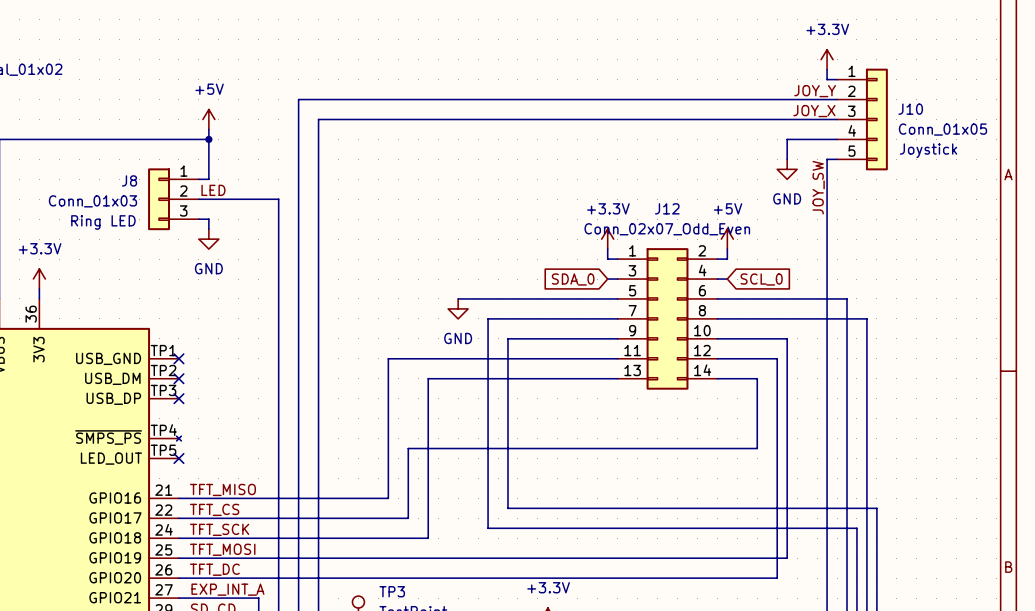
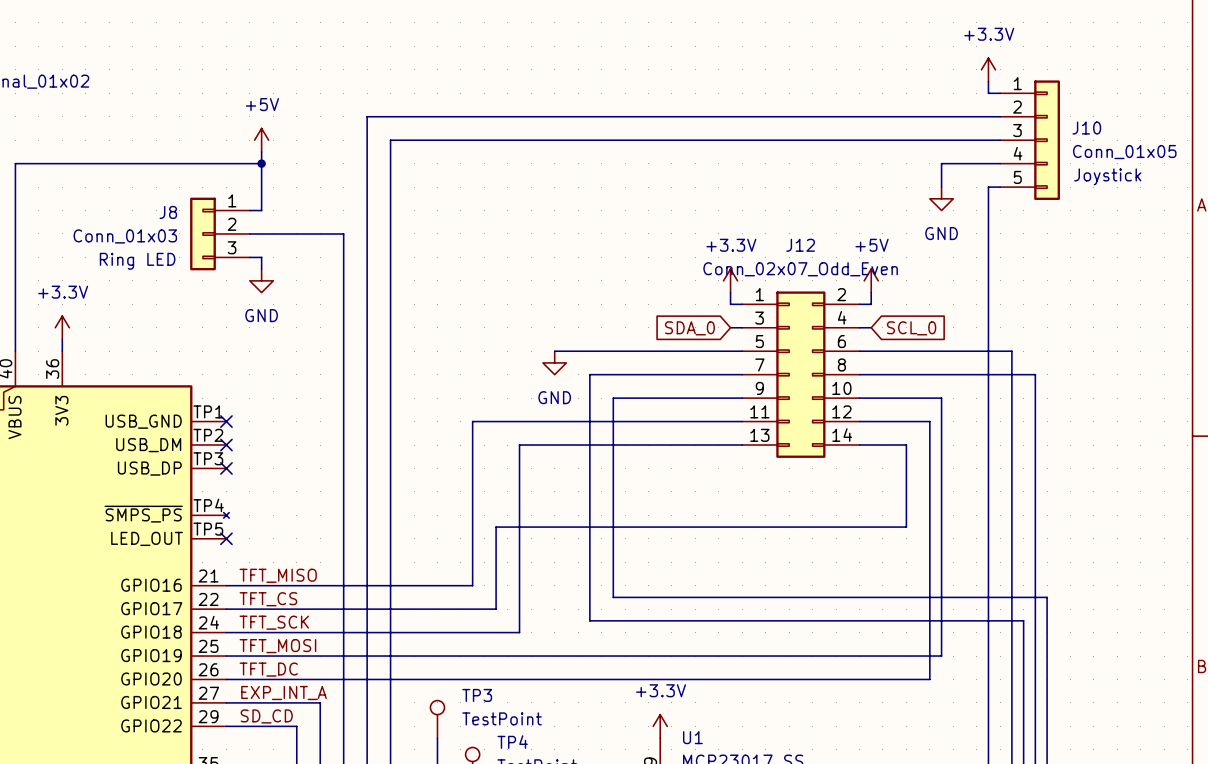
label: JOY_Y (815, 91) -> none
label: JOY_X (814, 111) -> none
label: JOY_SW (818, 187) -> none
label: LED (213, 190) -> none

